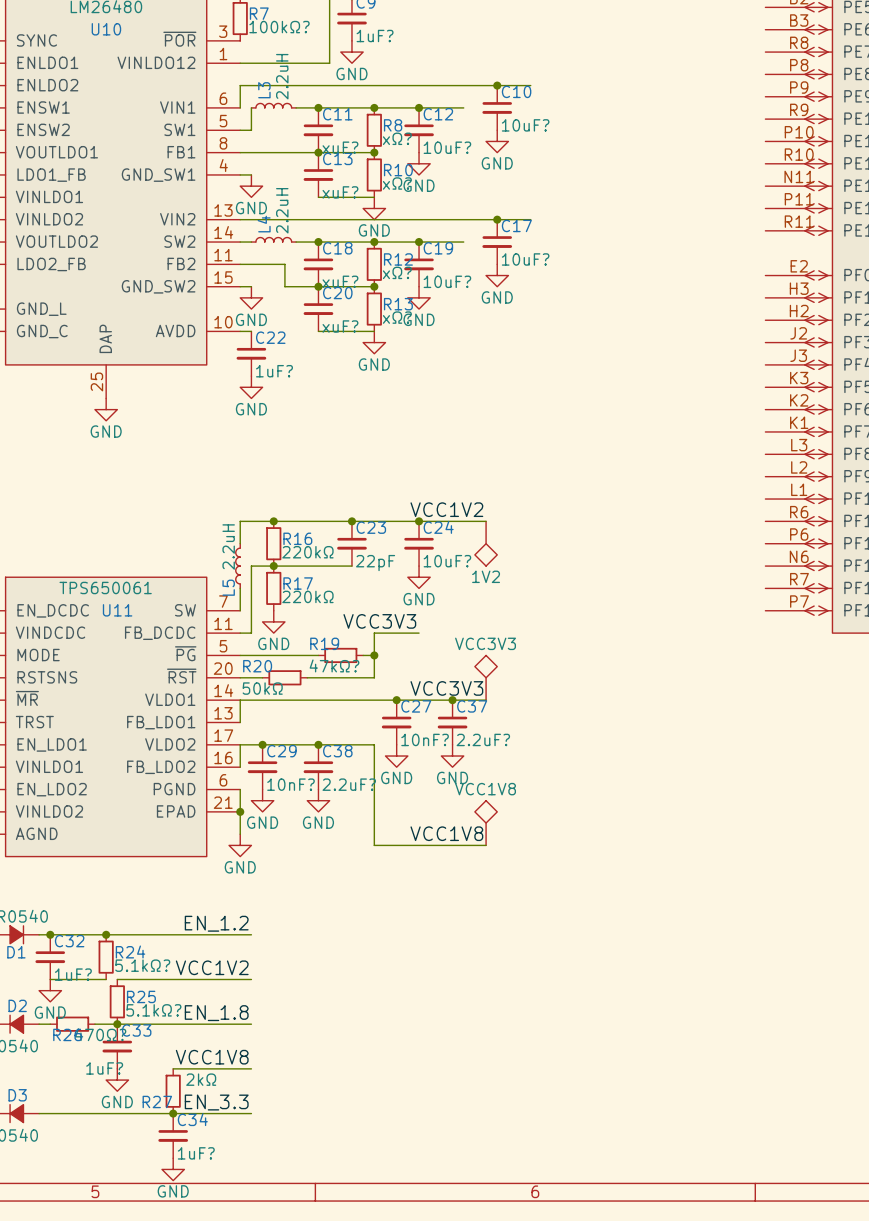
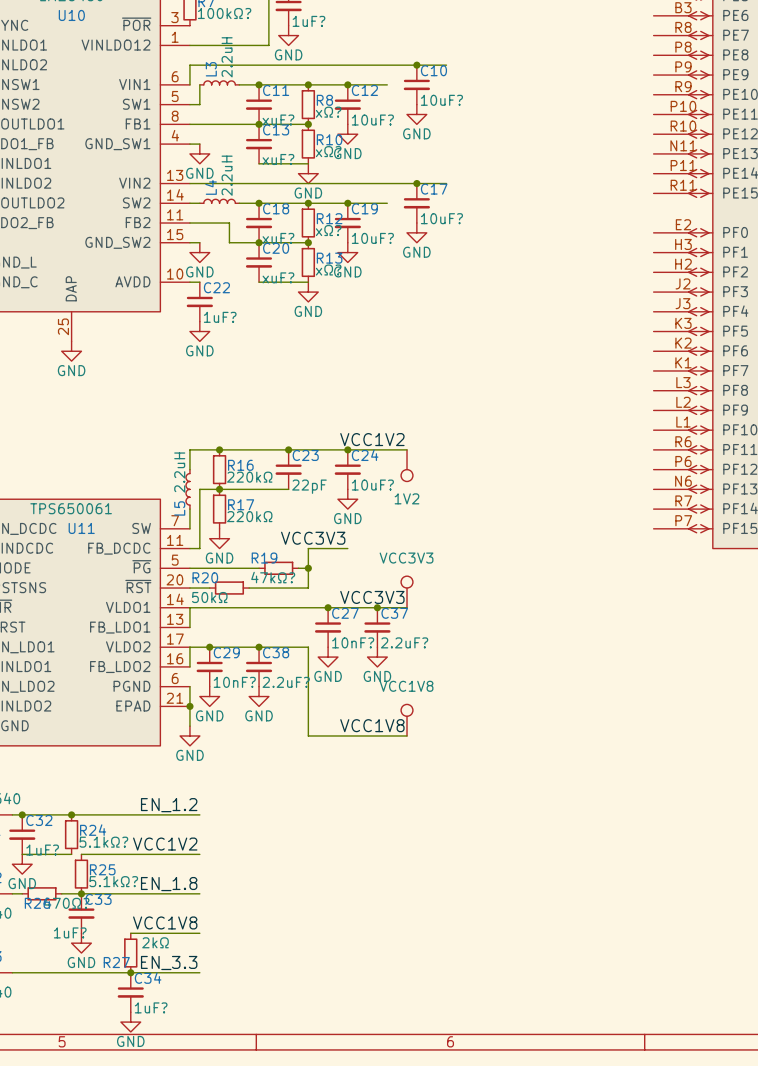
part symbol: [474, 521, 498, 567] -> [401, 449, 413, 482]
part symbol: [474, 655, 498, 701] -> [401, 576, 413, 608]
part symbol: [474, 800, 498, 846] -> [401, 704, 413, 736]

